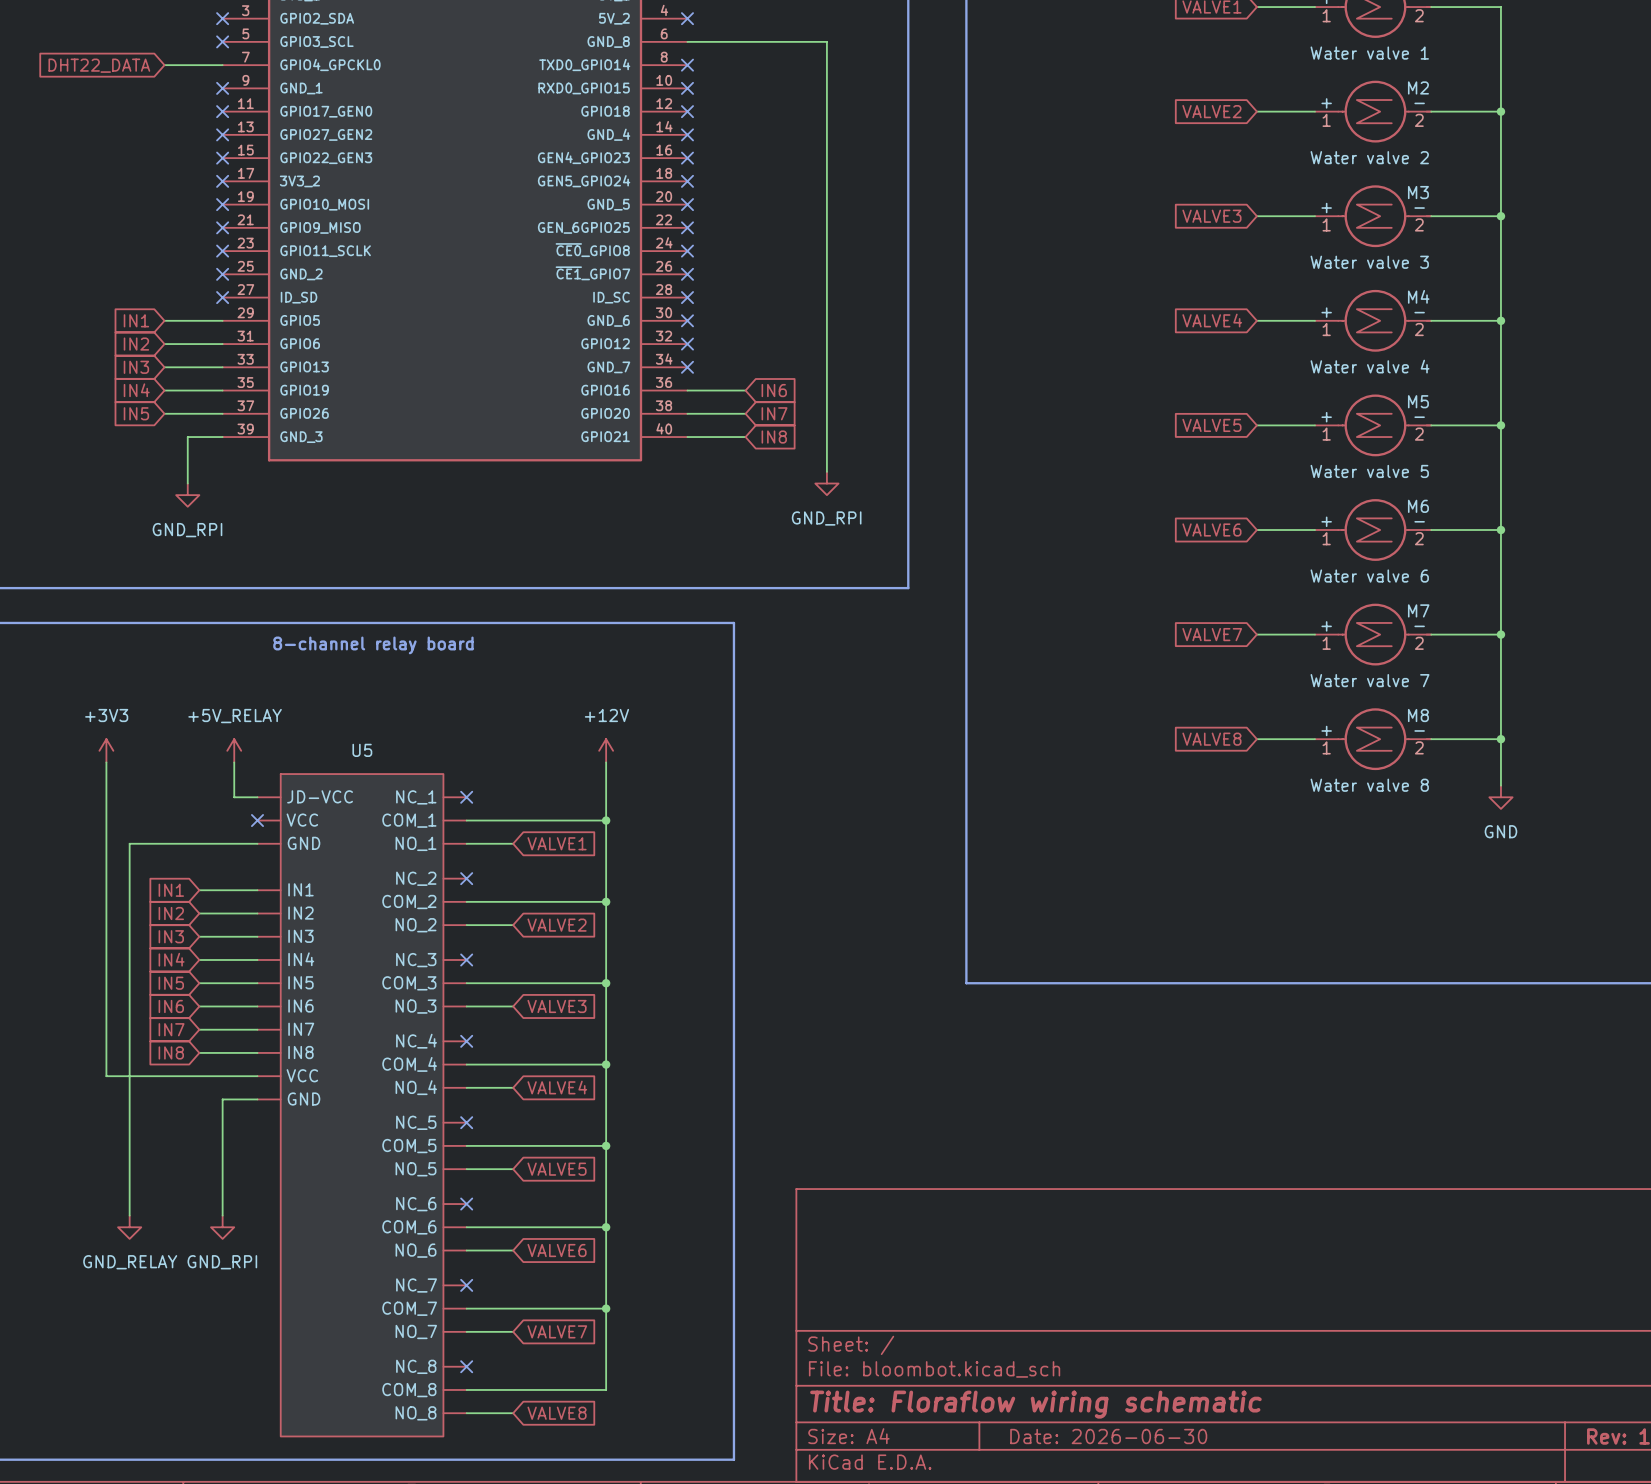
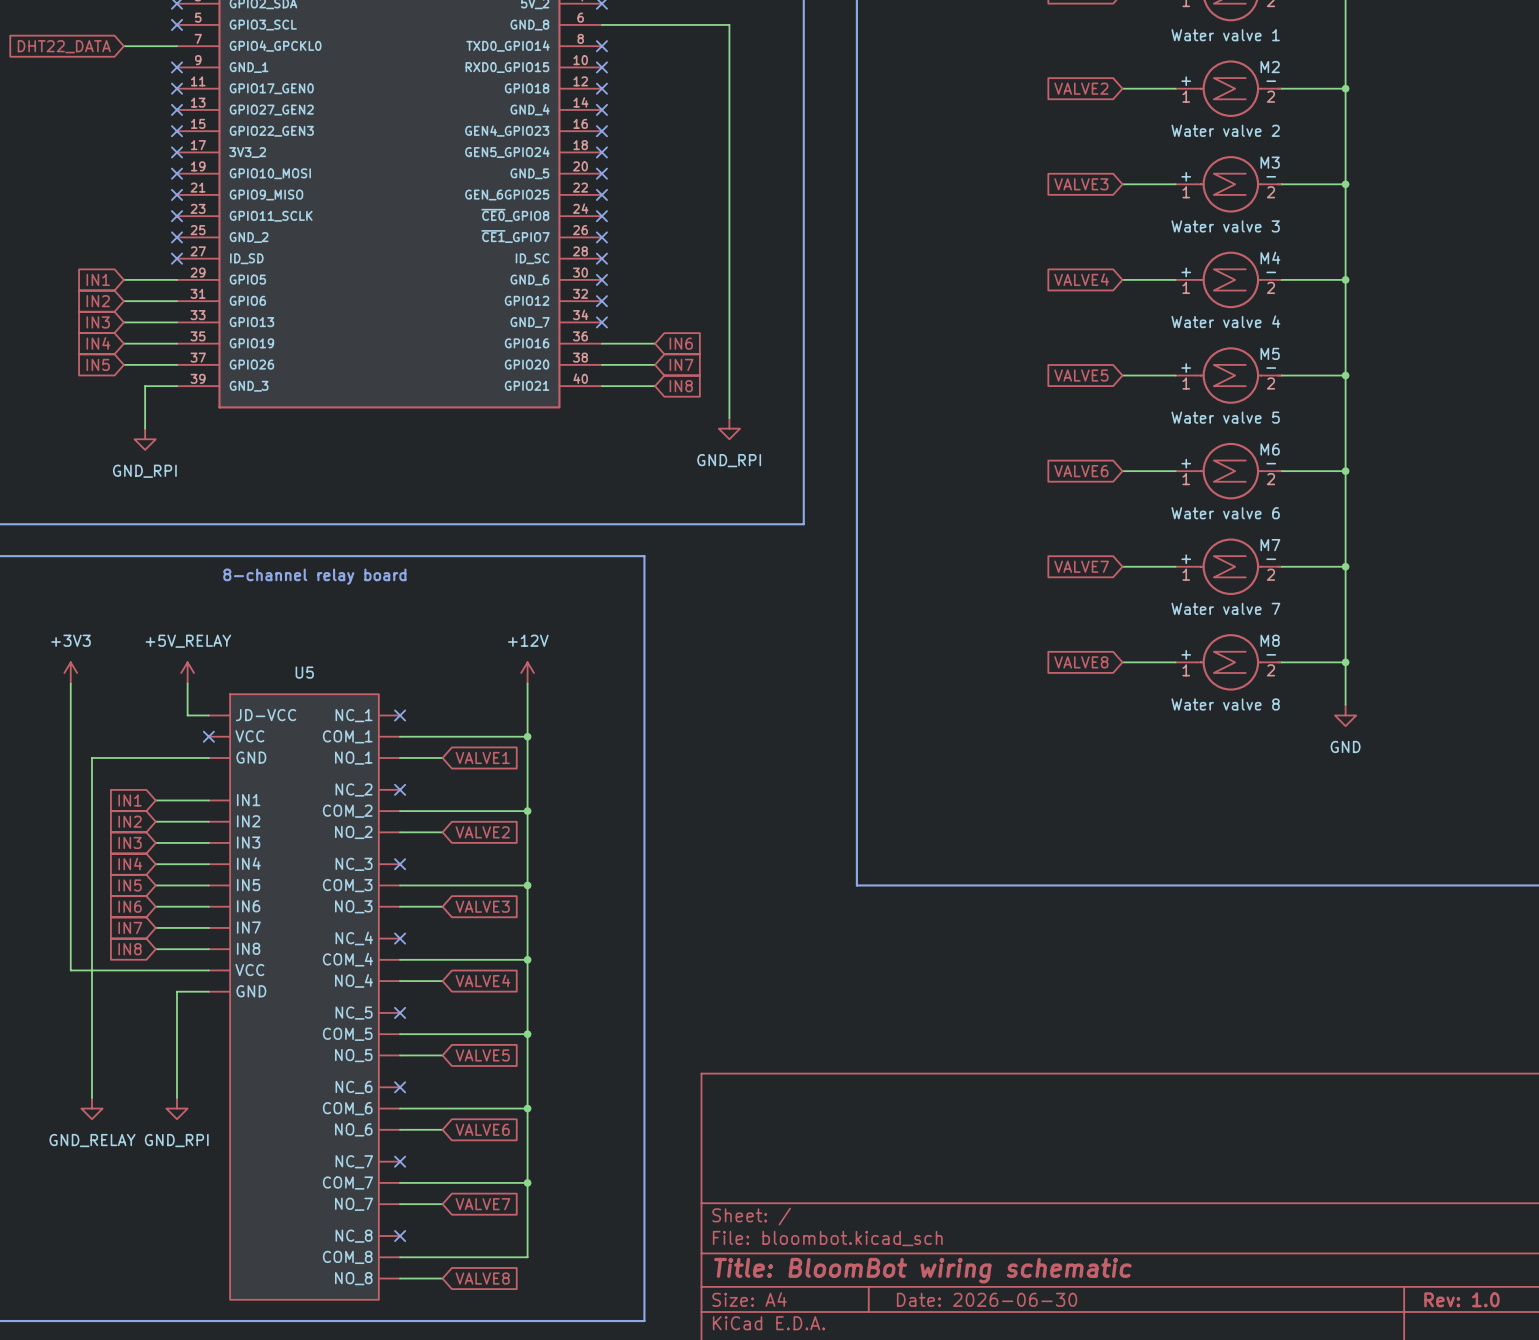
title block: Title: Floraflow wiring schematic (1035, 1404) -> Title: BloomBot wiring schematic (922, 1270)

